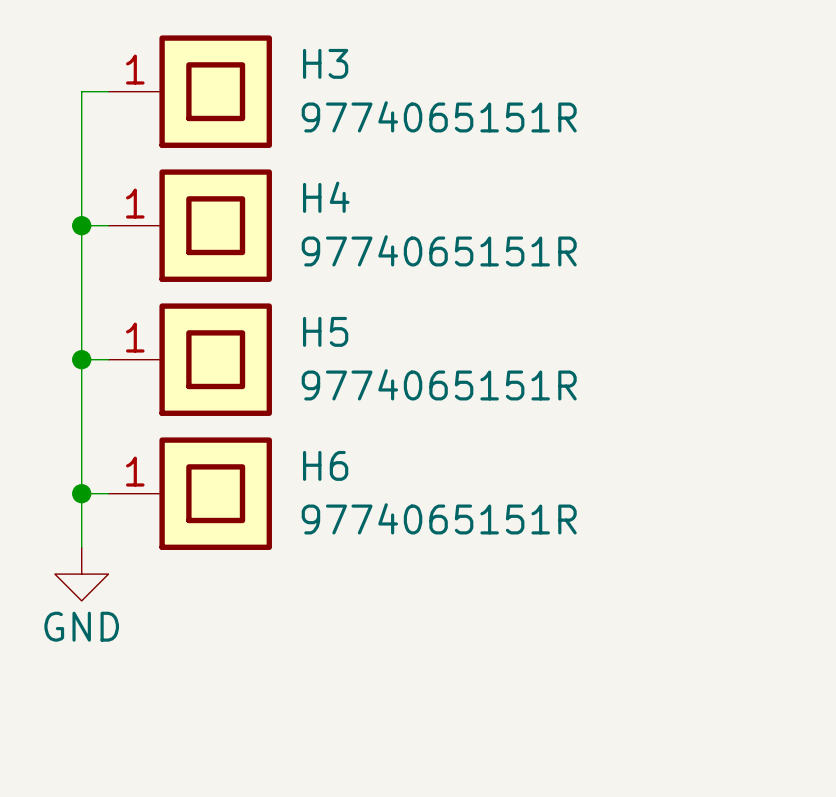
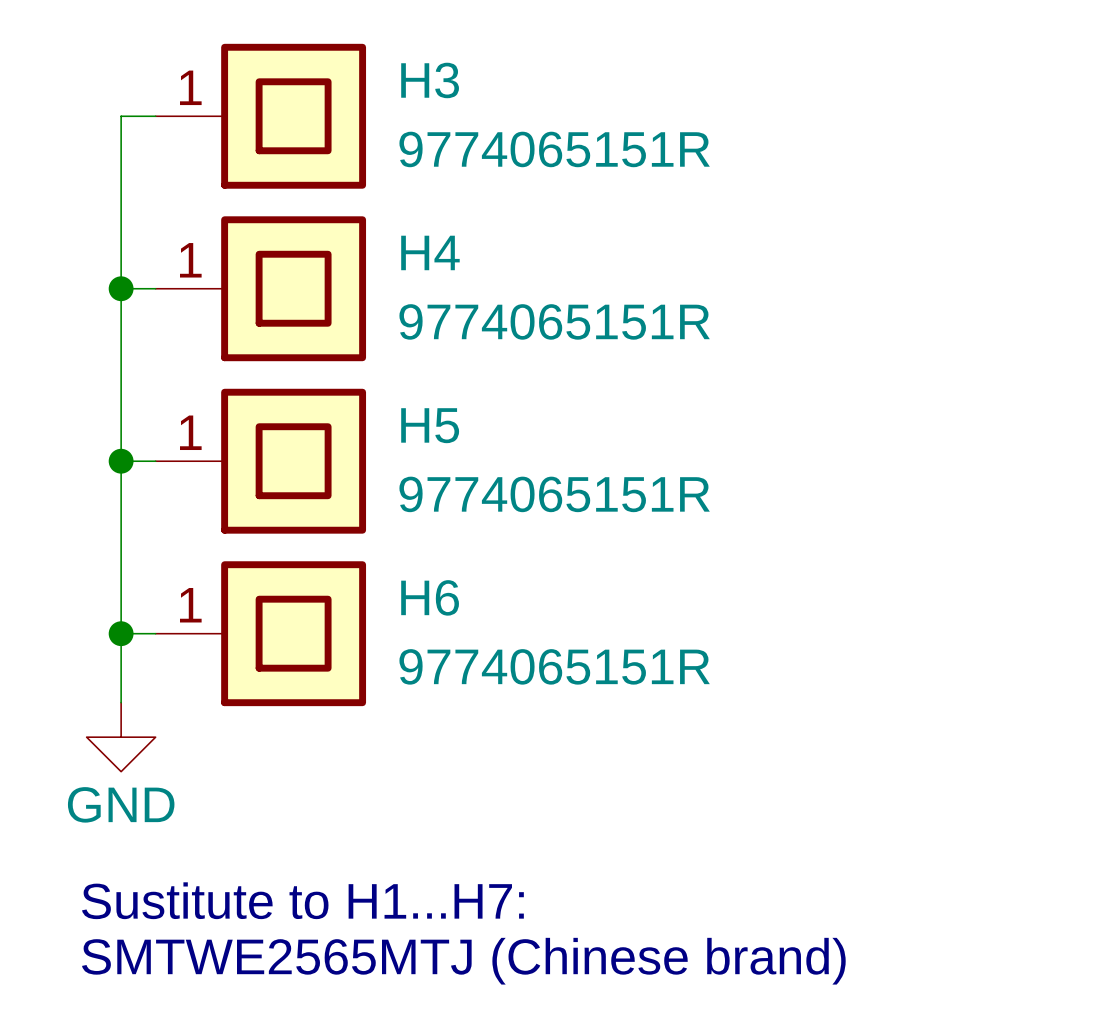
text: none -> Sustitute to H1...H7: (302, 900)
text: none -> SMTWE2565MTJ (Chinese brand) (463, 961)

